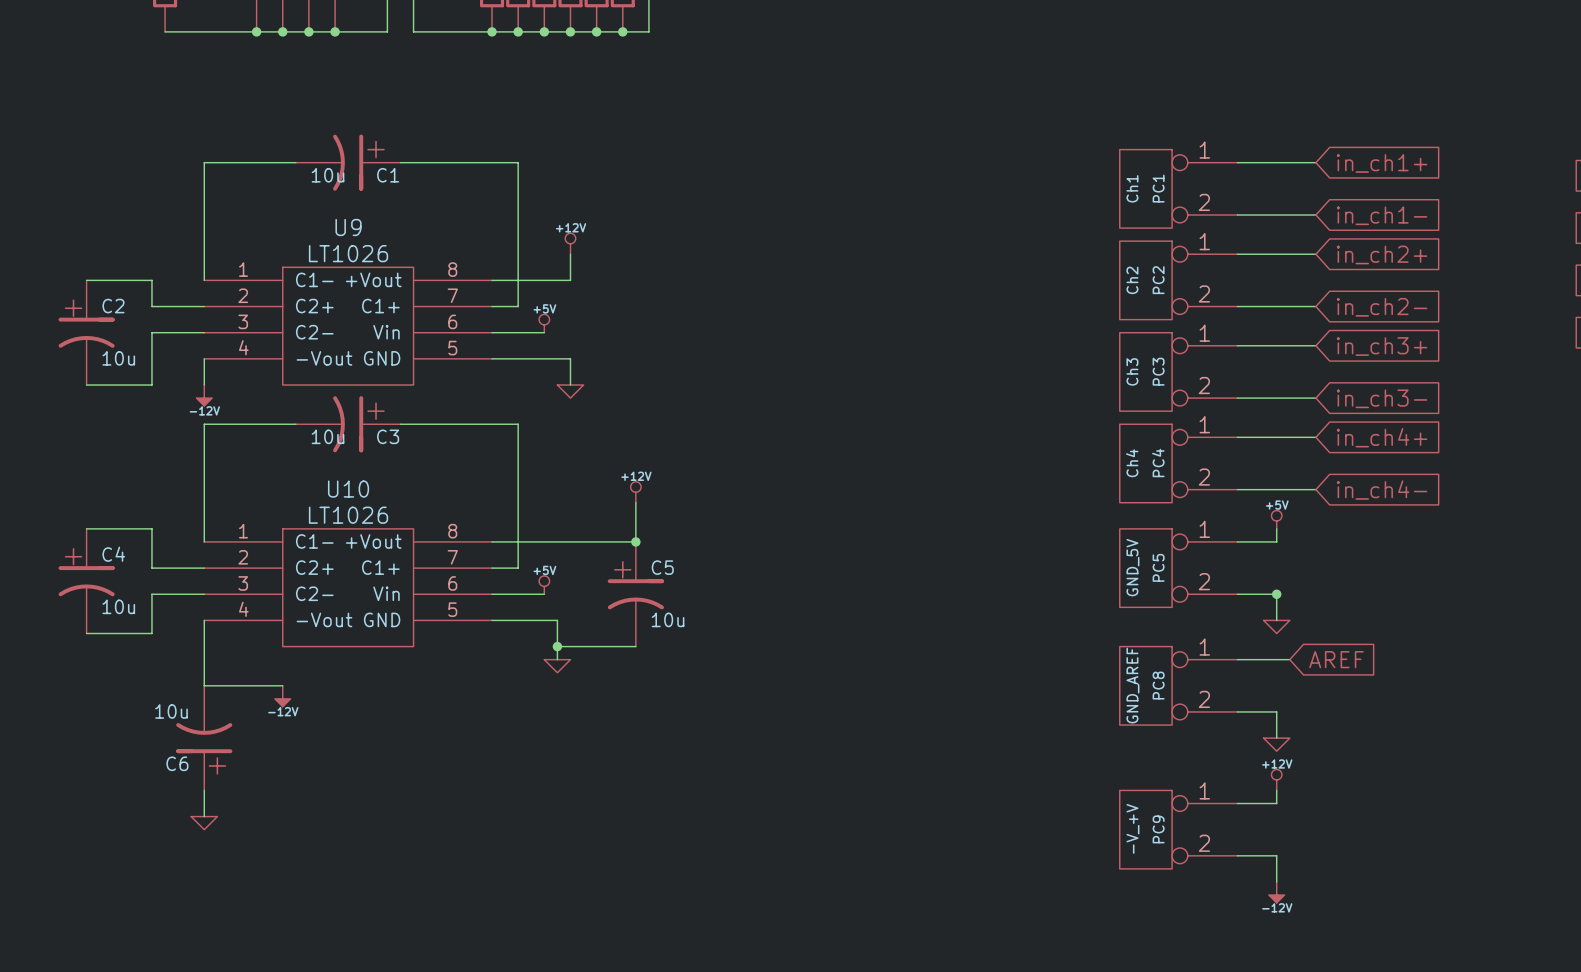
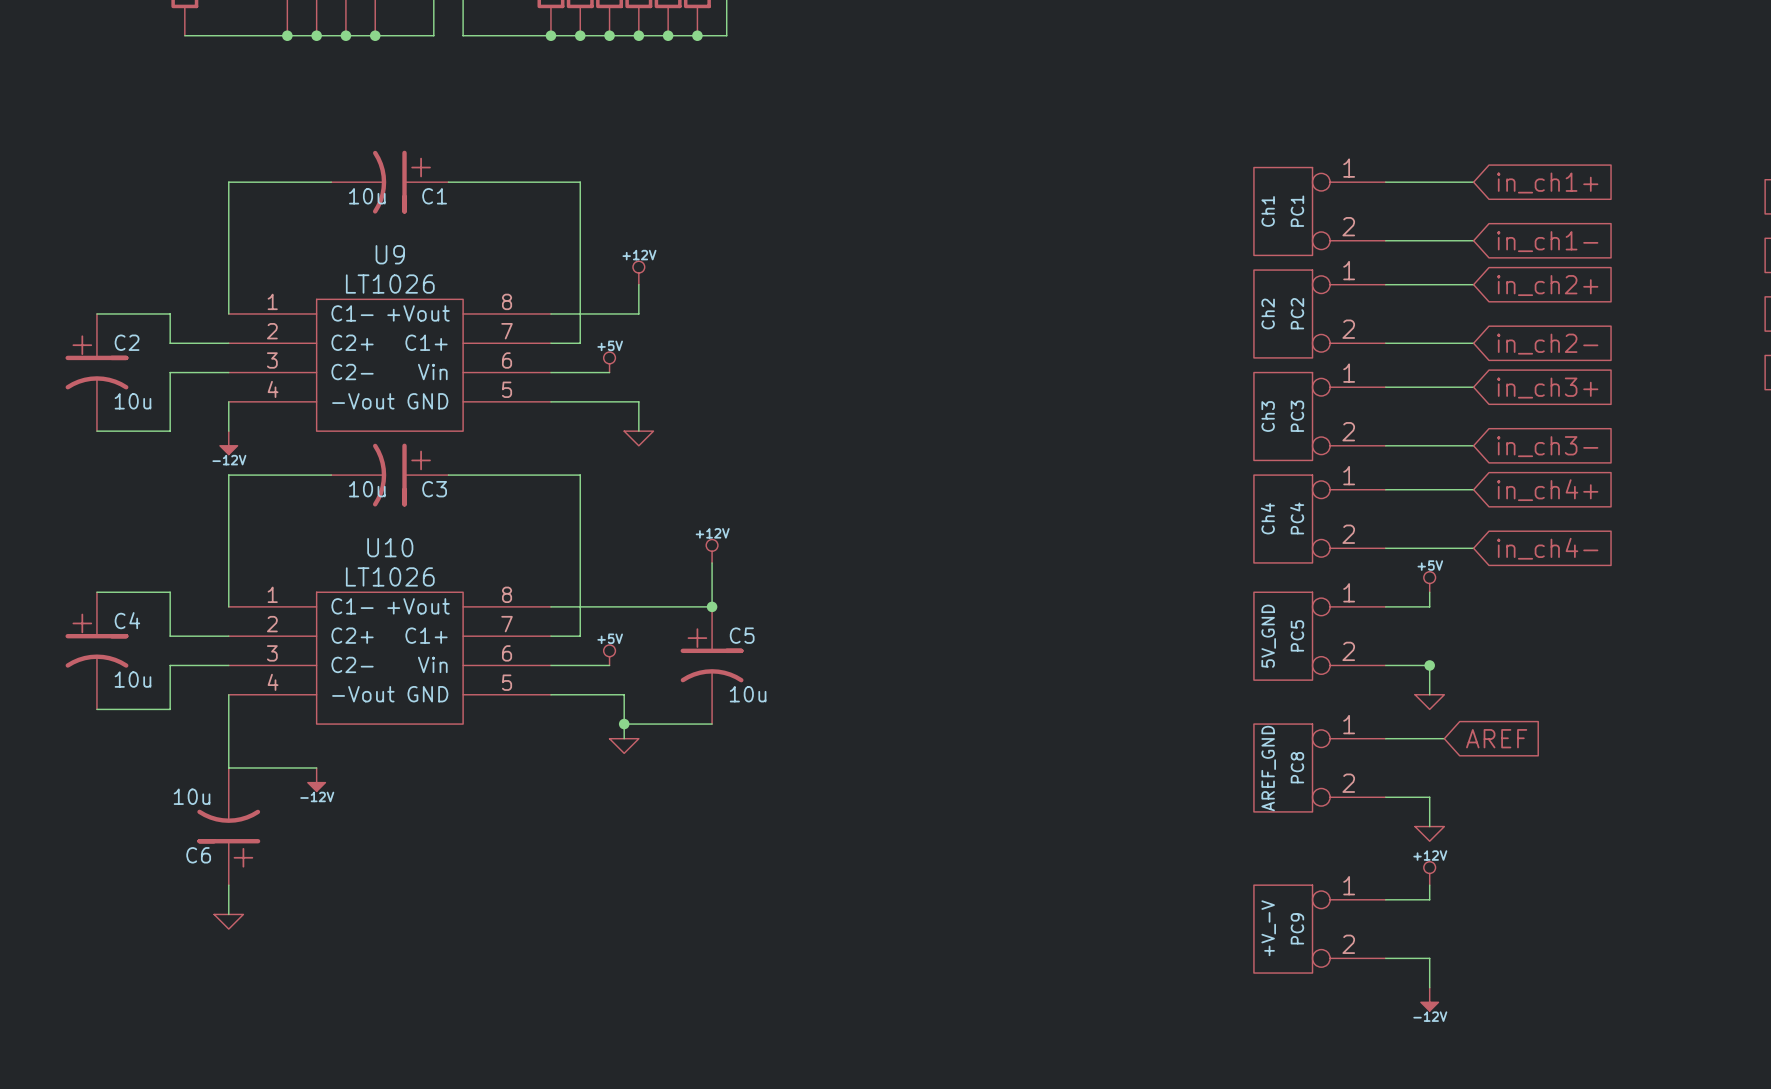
PC5 value: GND_5V (1132, 567) -> 5V_GND (1268, 636)
PC8 value: GND_AREF (1132, 685) -> AREF_GND (1268, 768)
PC9 value: -V_+V (1132, 828) -> +V_-V (1268, 928)

